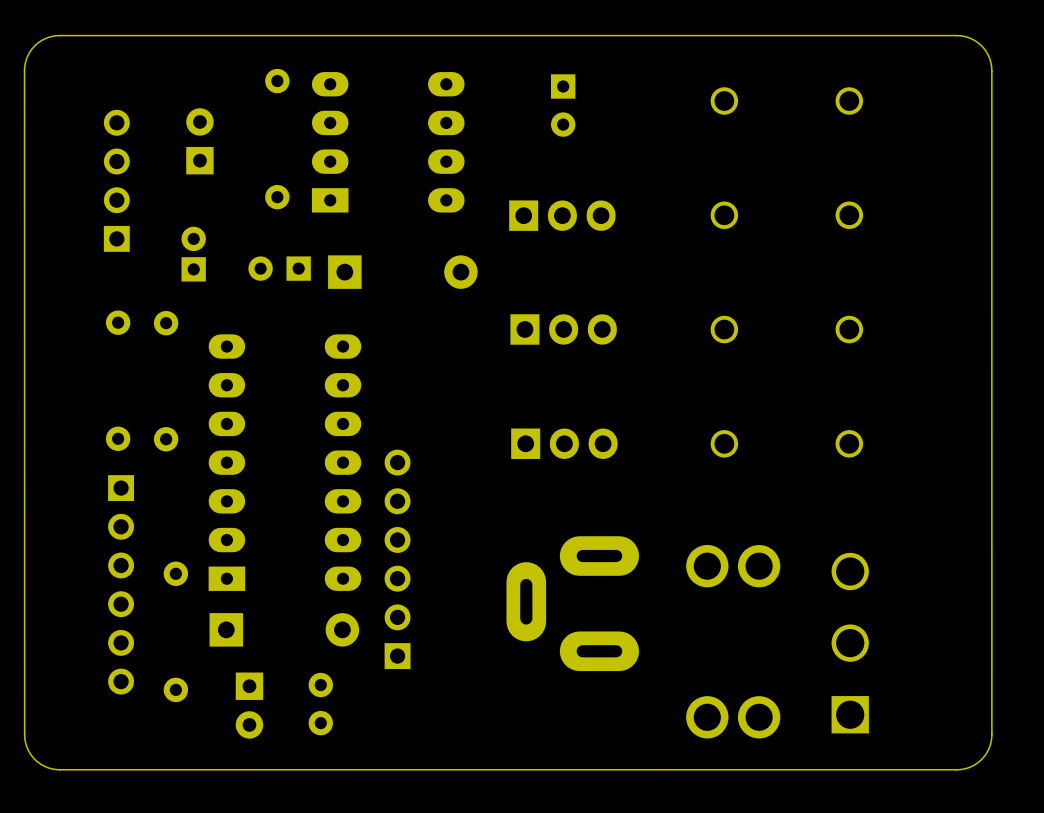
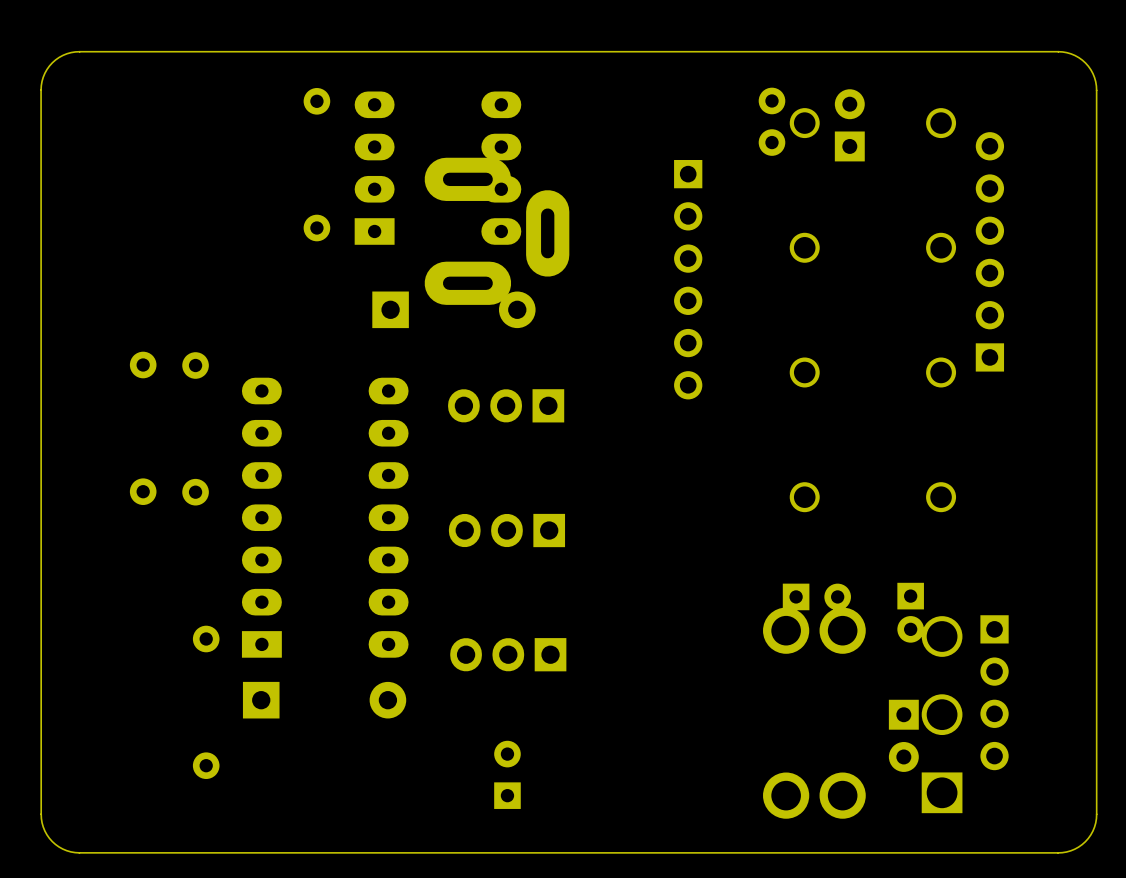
part: none -> (771, 121)
part: none -> (849, 125)
part: (563, 105) -> none
part: (199, 141) -> none
part: (116, 180) -> none
part: none -> (496, 231)
part: (562, 215) -> none
part: none -> (989, 251)
part: none -> (688, 279)
part: (193, 254) -> none
part: (279, 268) -> none
part: (563, 329) -> none
part: none -> (506, 405)
part: (564, 443) -> none
part: none -> (506, 530)
part: none -> (816, 596)
part: none -> (910, 612)
part: (397, 559) -> none
part: (121, 584) -> none
part: none -> (508, 654)
part: (572, 603) -> none
part: none -> (994, 692)
part: none -> (903, 735)
part: none -> (507, 774)
part: (320, 704) -> none
part: (249, 705) -> none

